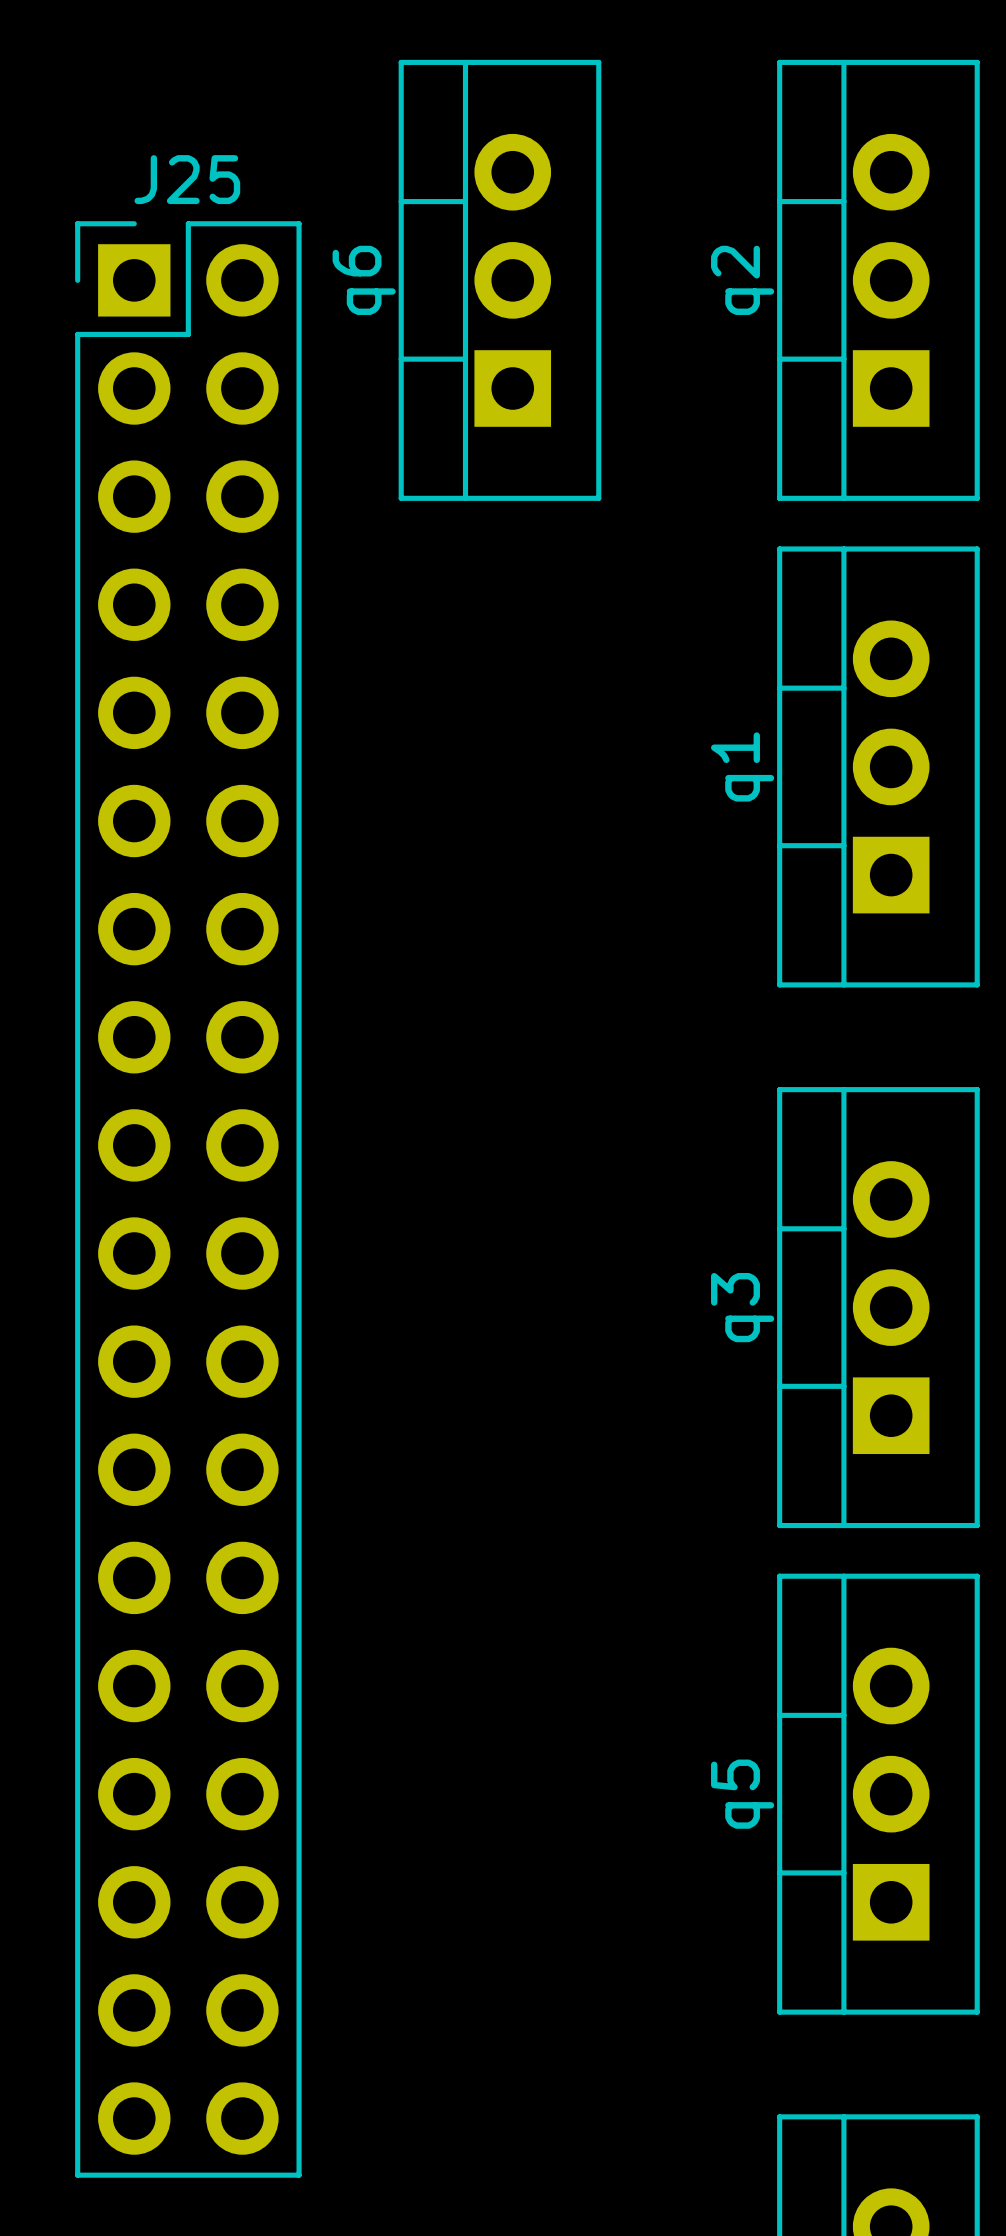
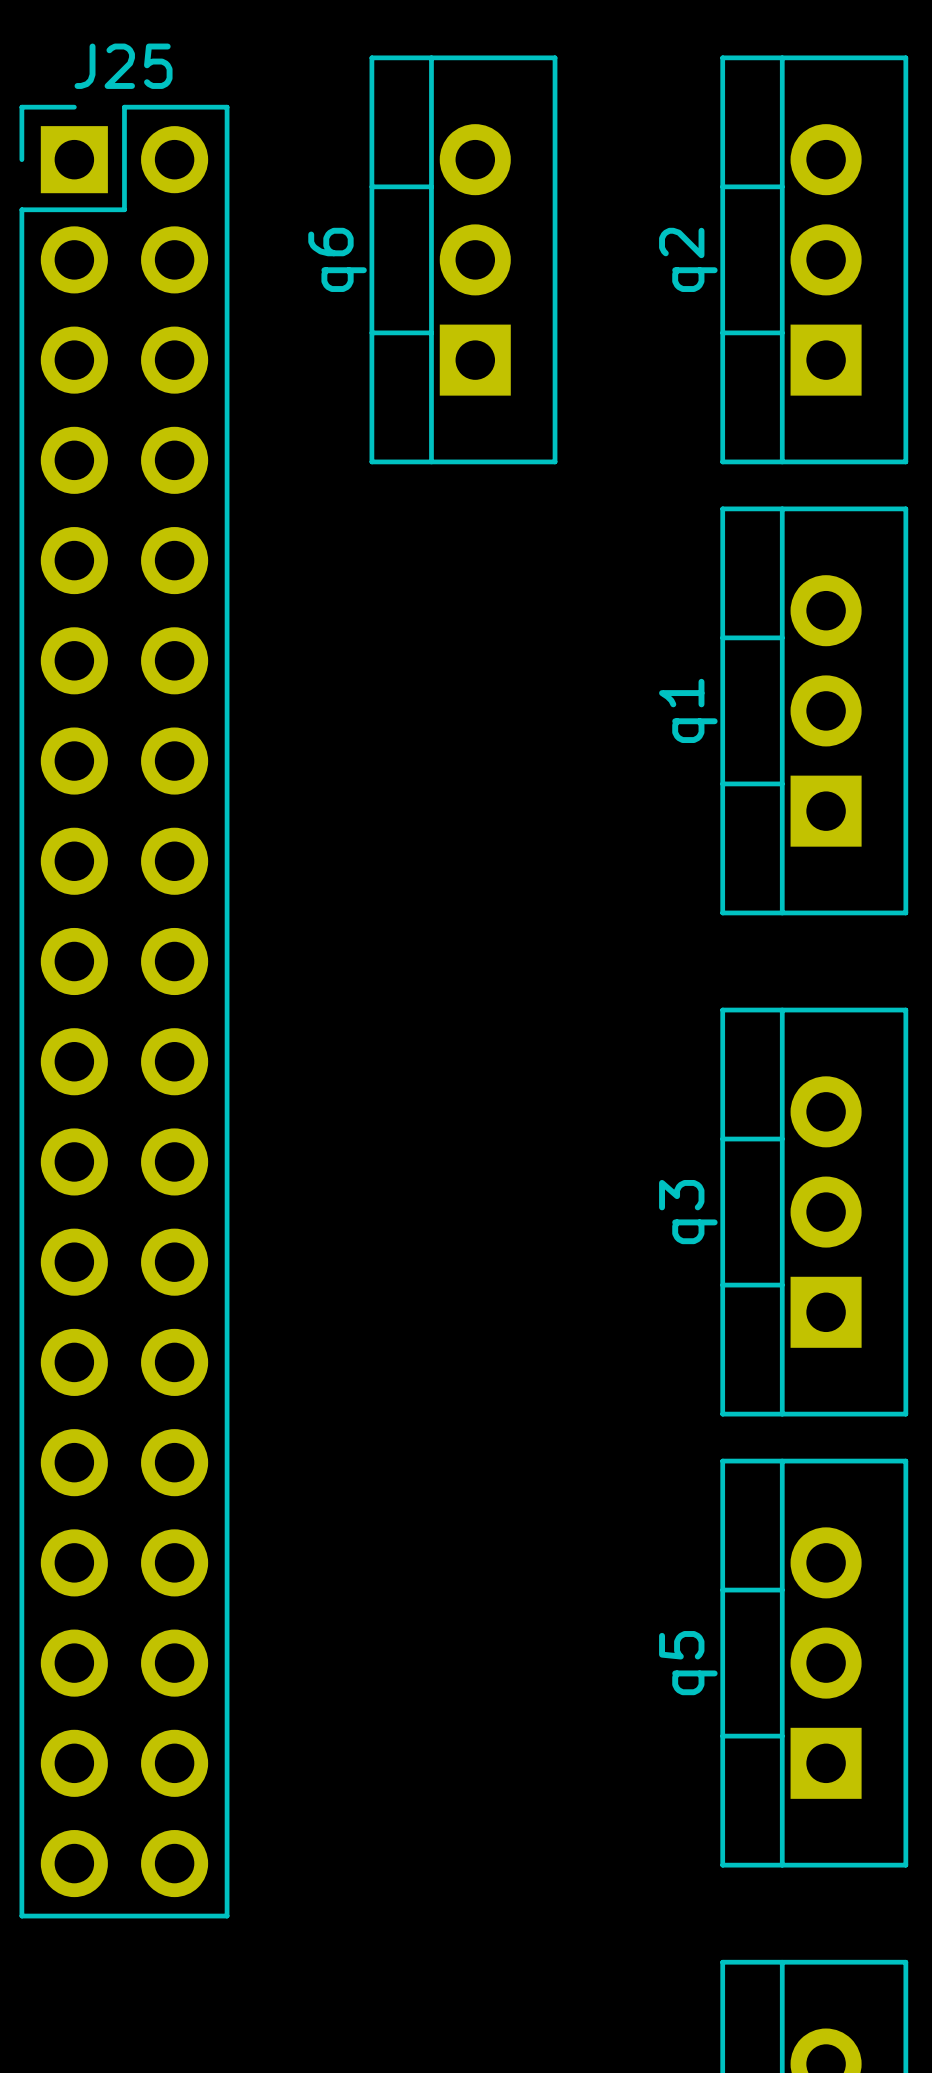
J25 position: (188, 1199) -> (124, 1011)

